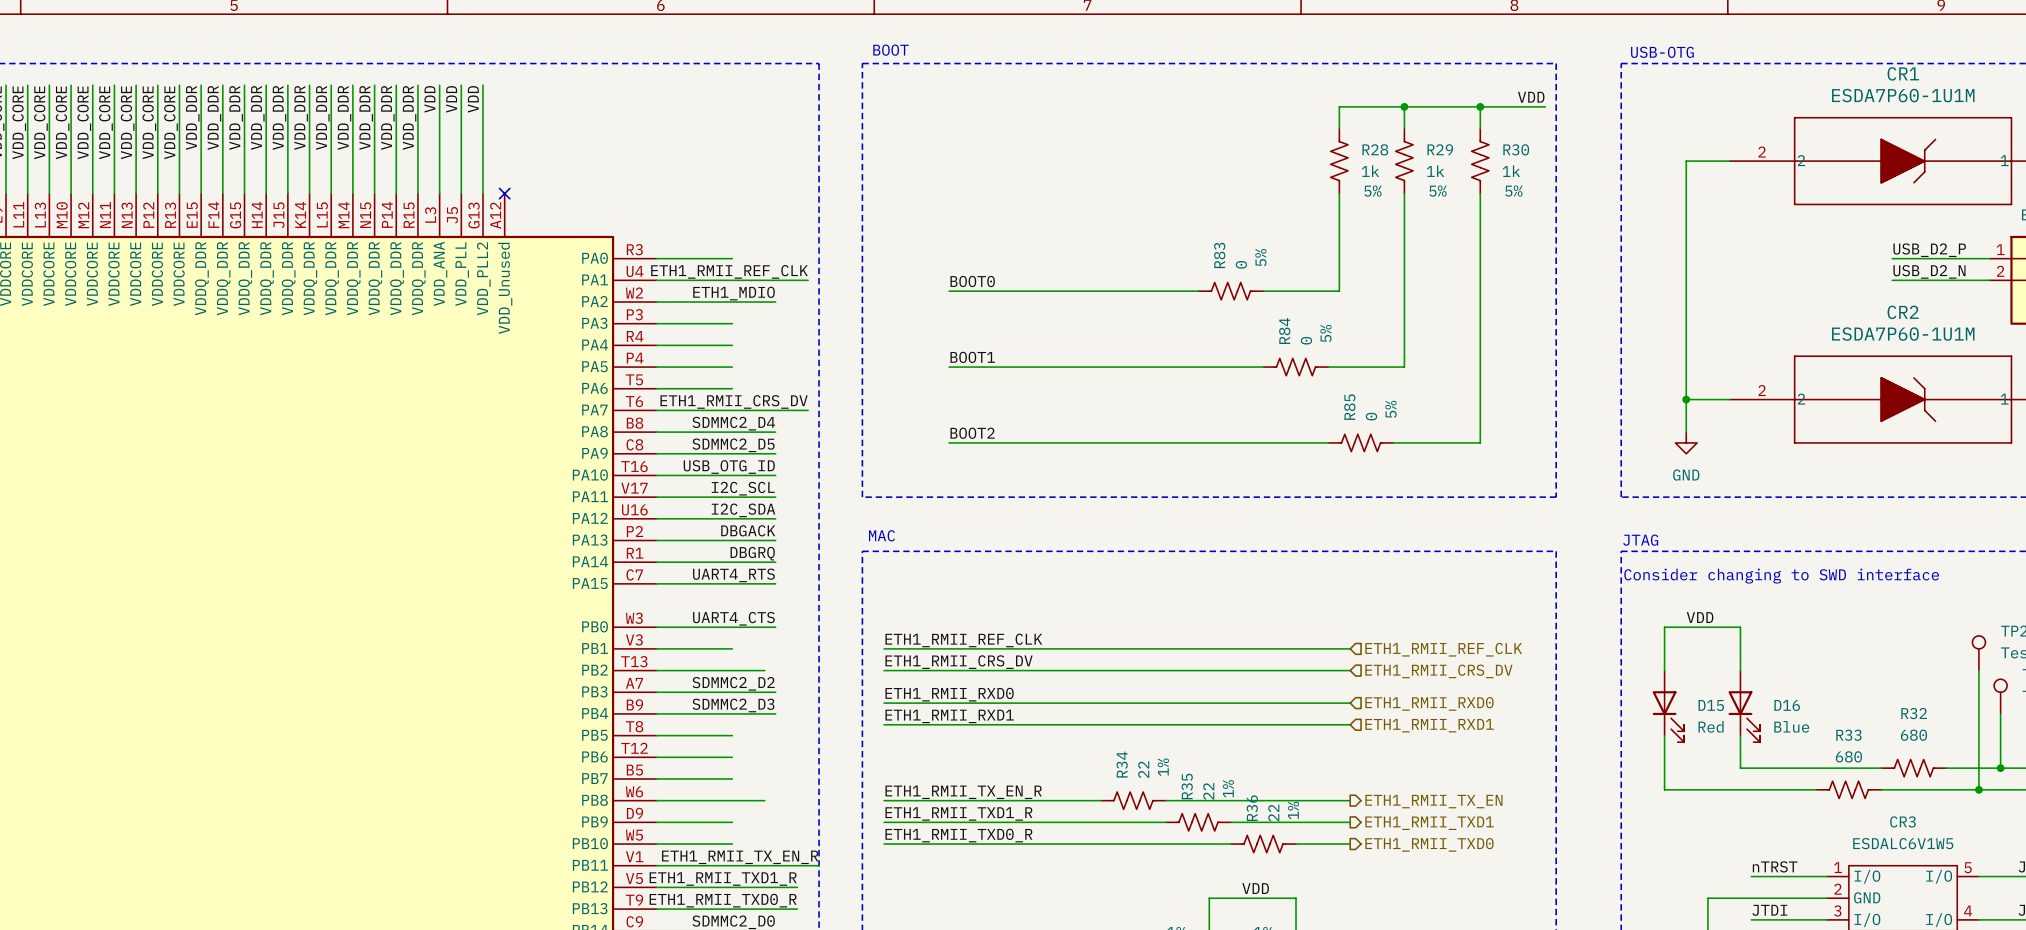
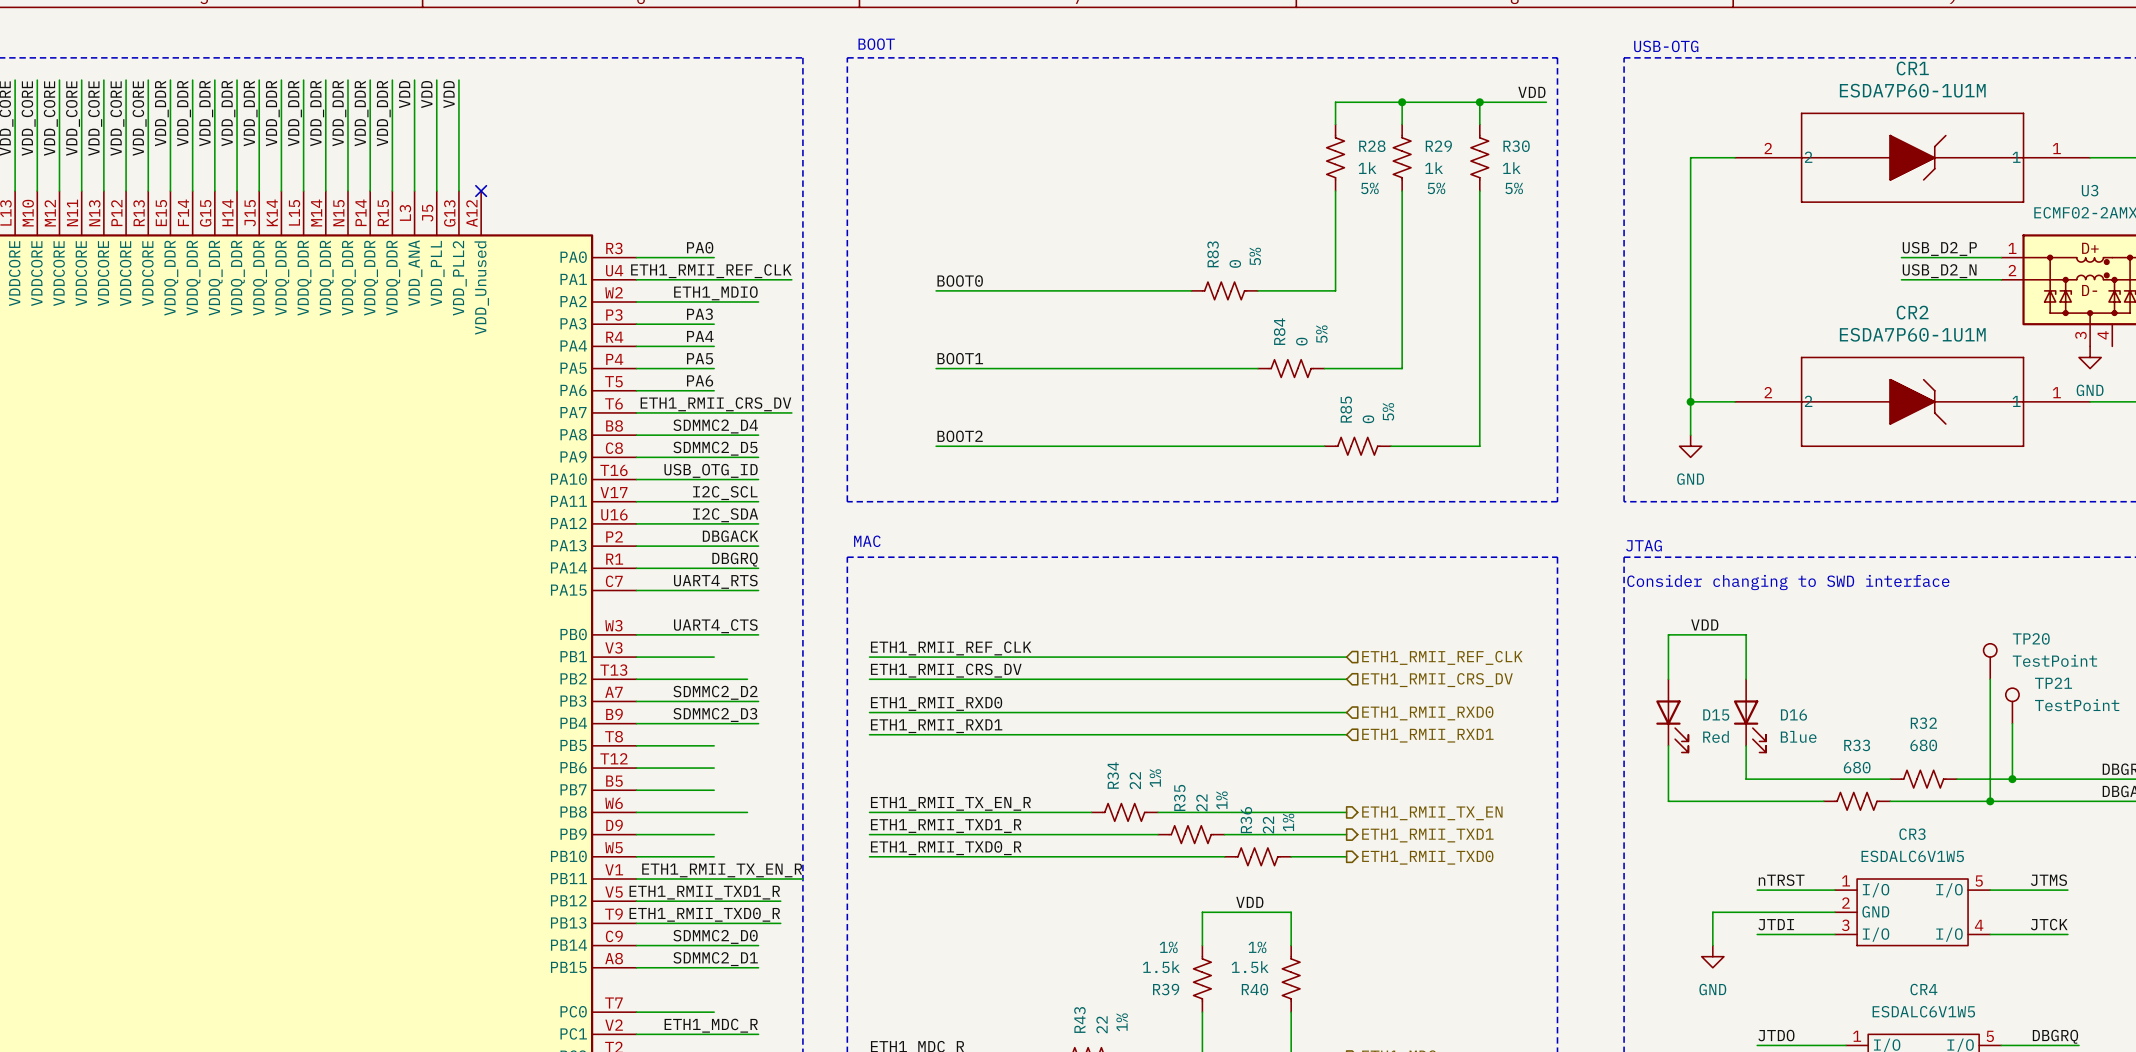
label: none -> PA0 (700, 247)
label: none -> PA3 (699, 314)
label: none -> PA4 (700, 336)
label: none -> PA5 (700, 358)
label: none -> PA6 (700, 380)

